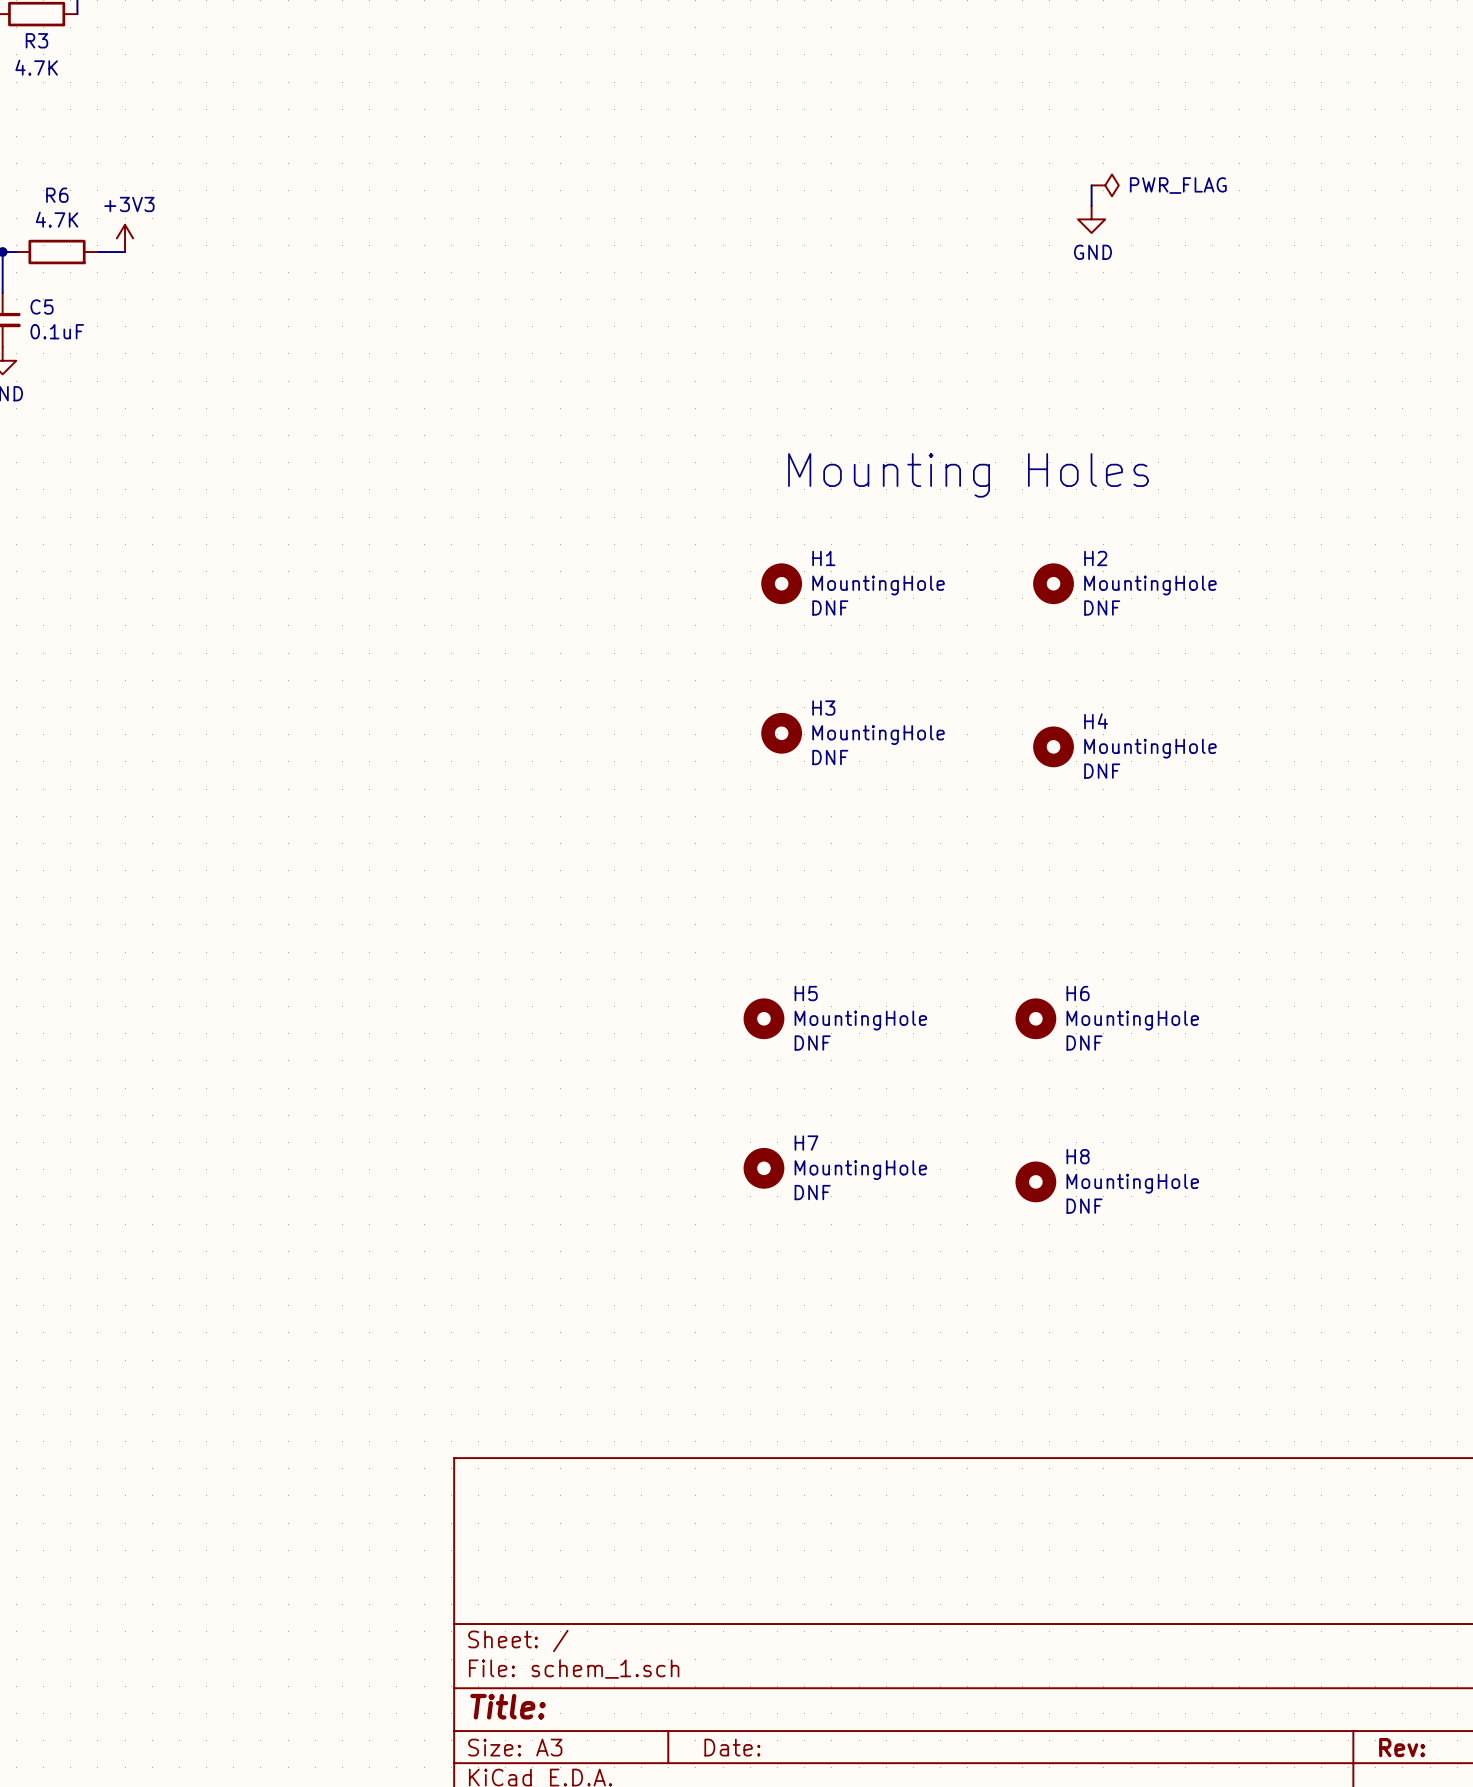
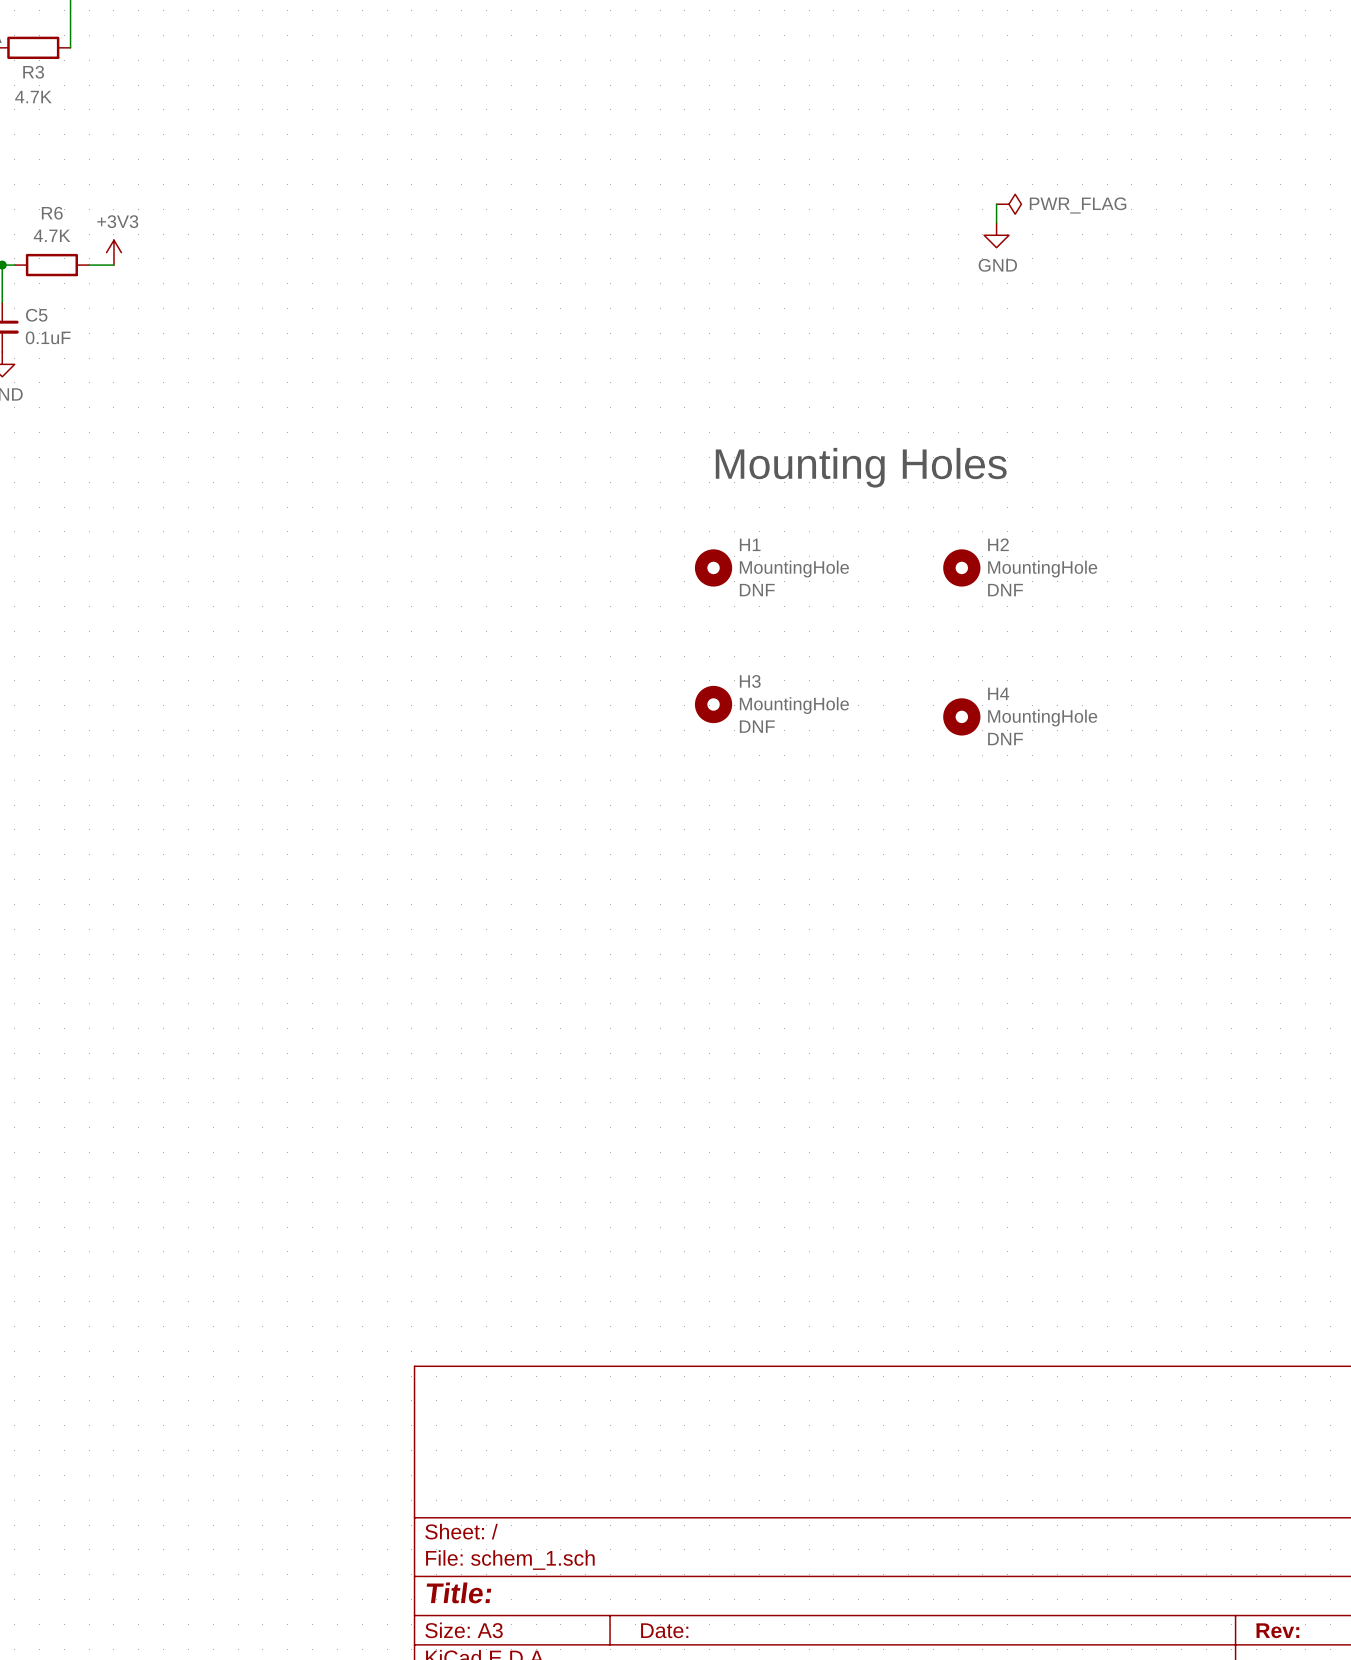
H5: MountingHole (763, 1018) -> none
H6: MountingHole (1035, 1018) -> none
H7: MountingHole (763, 1168) -> none
H8: MountingHole (1035, 1181) -> none

